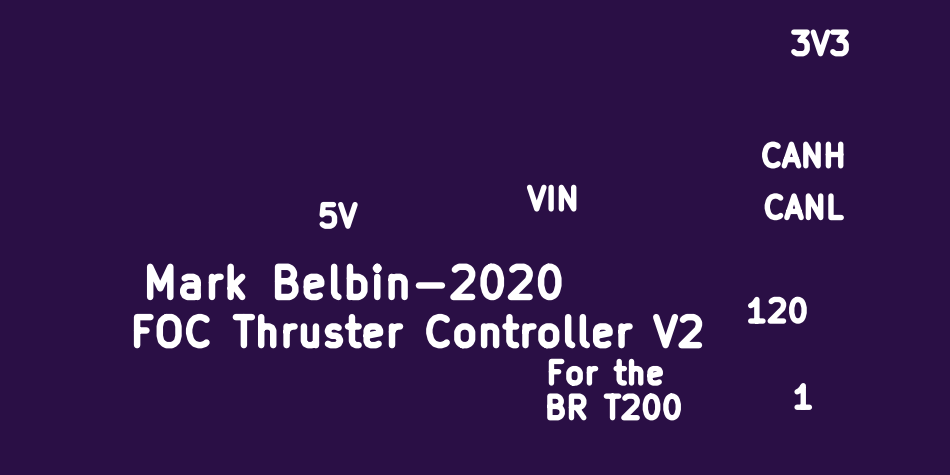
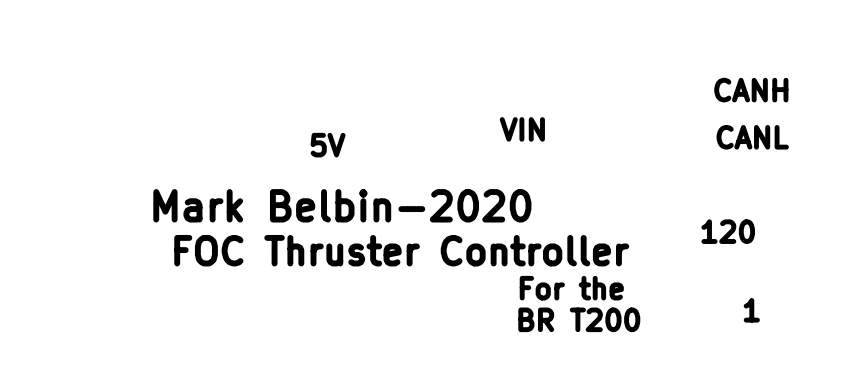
text: FOC Thruster Controller V2 (418, 331) -> FOC Thruster Controller (401, 250)

